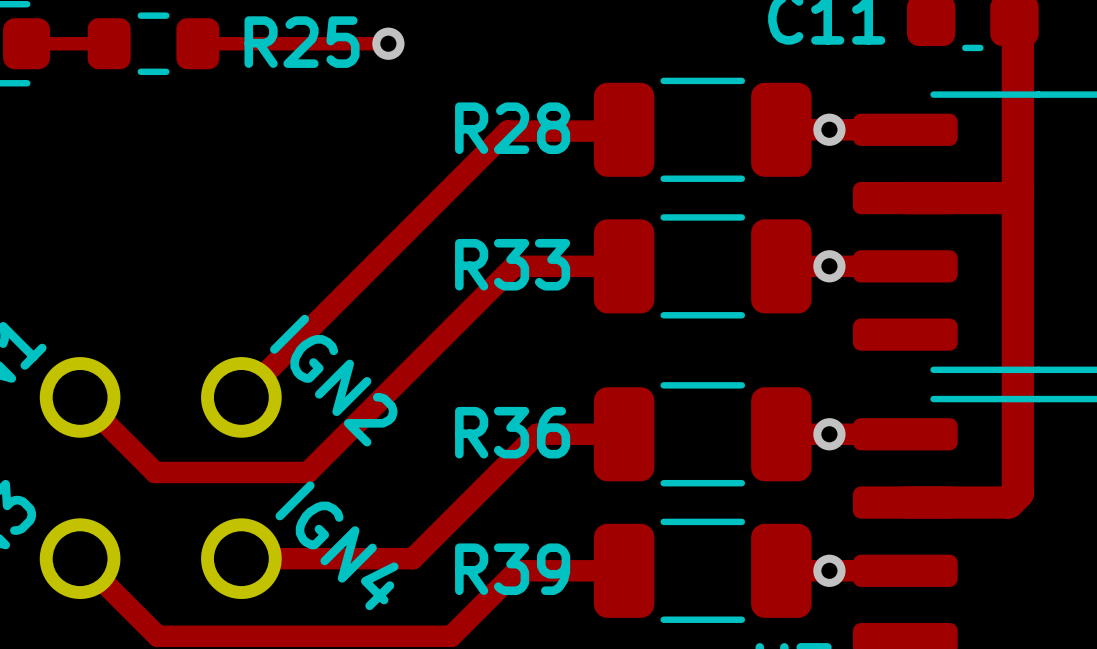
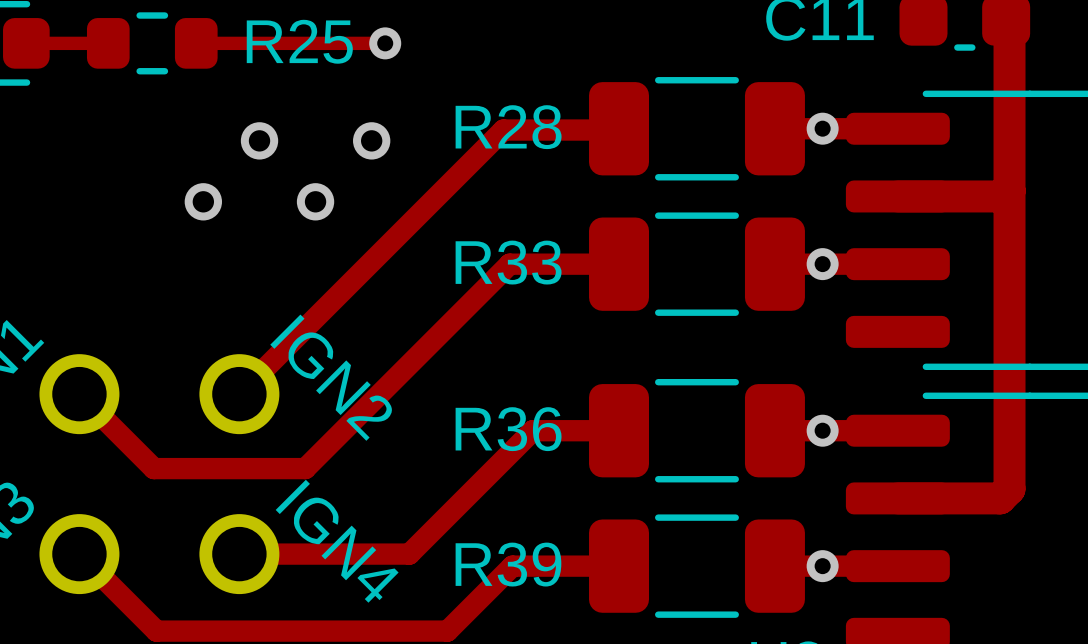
via: none -> (259, 140)
via: none -> (371, 140)
via: none -> (203, 201)
via: none -> (315, 201)

